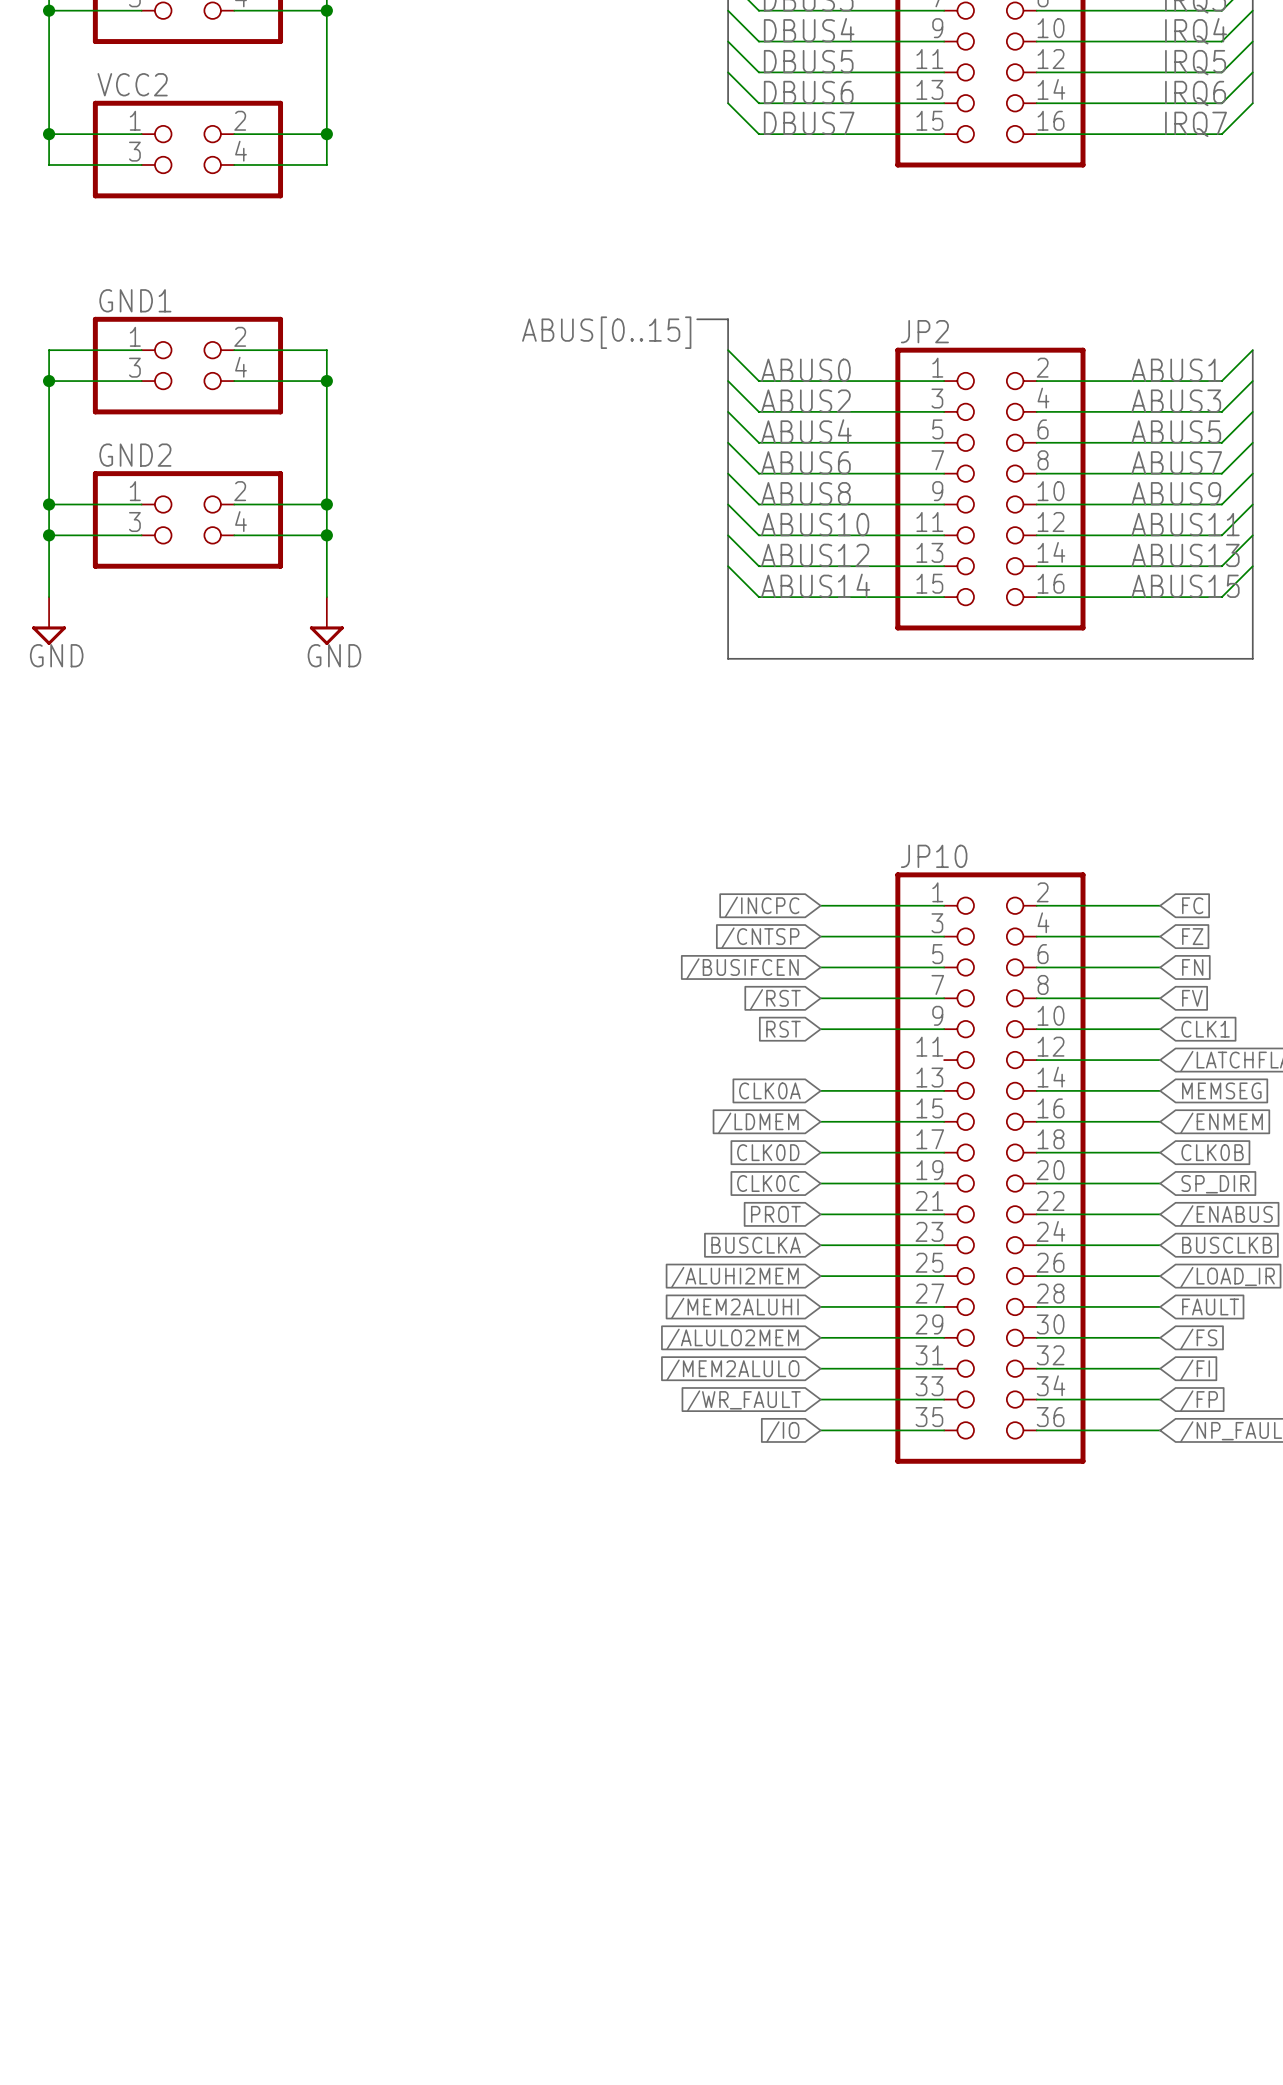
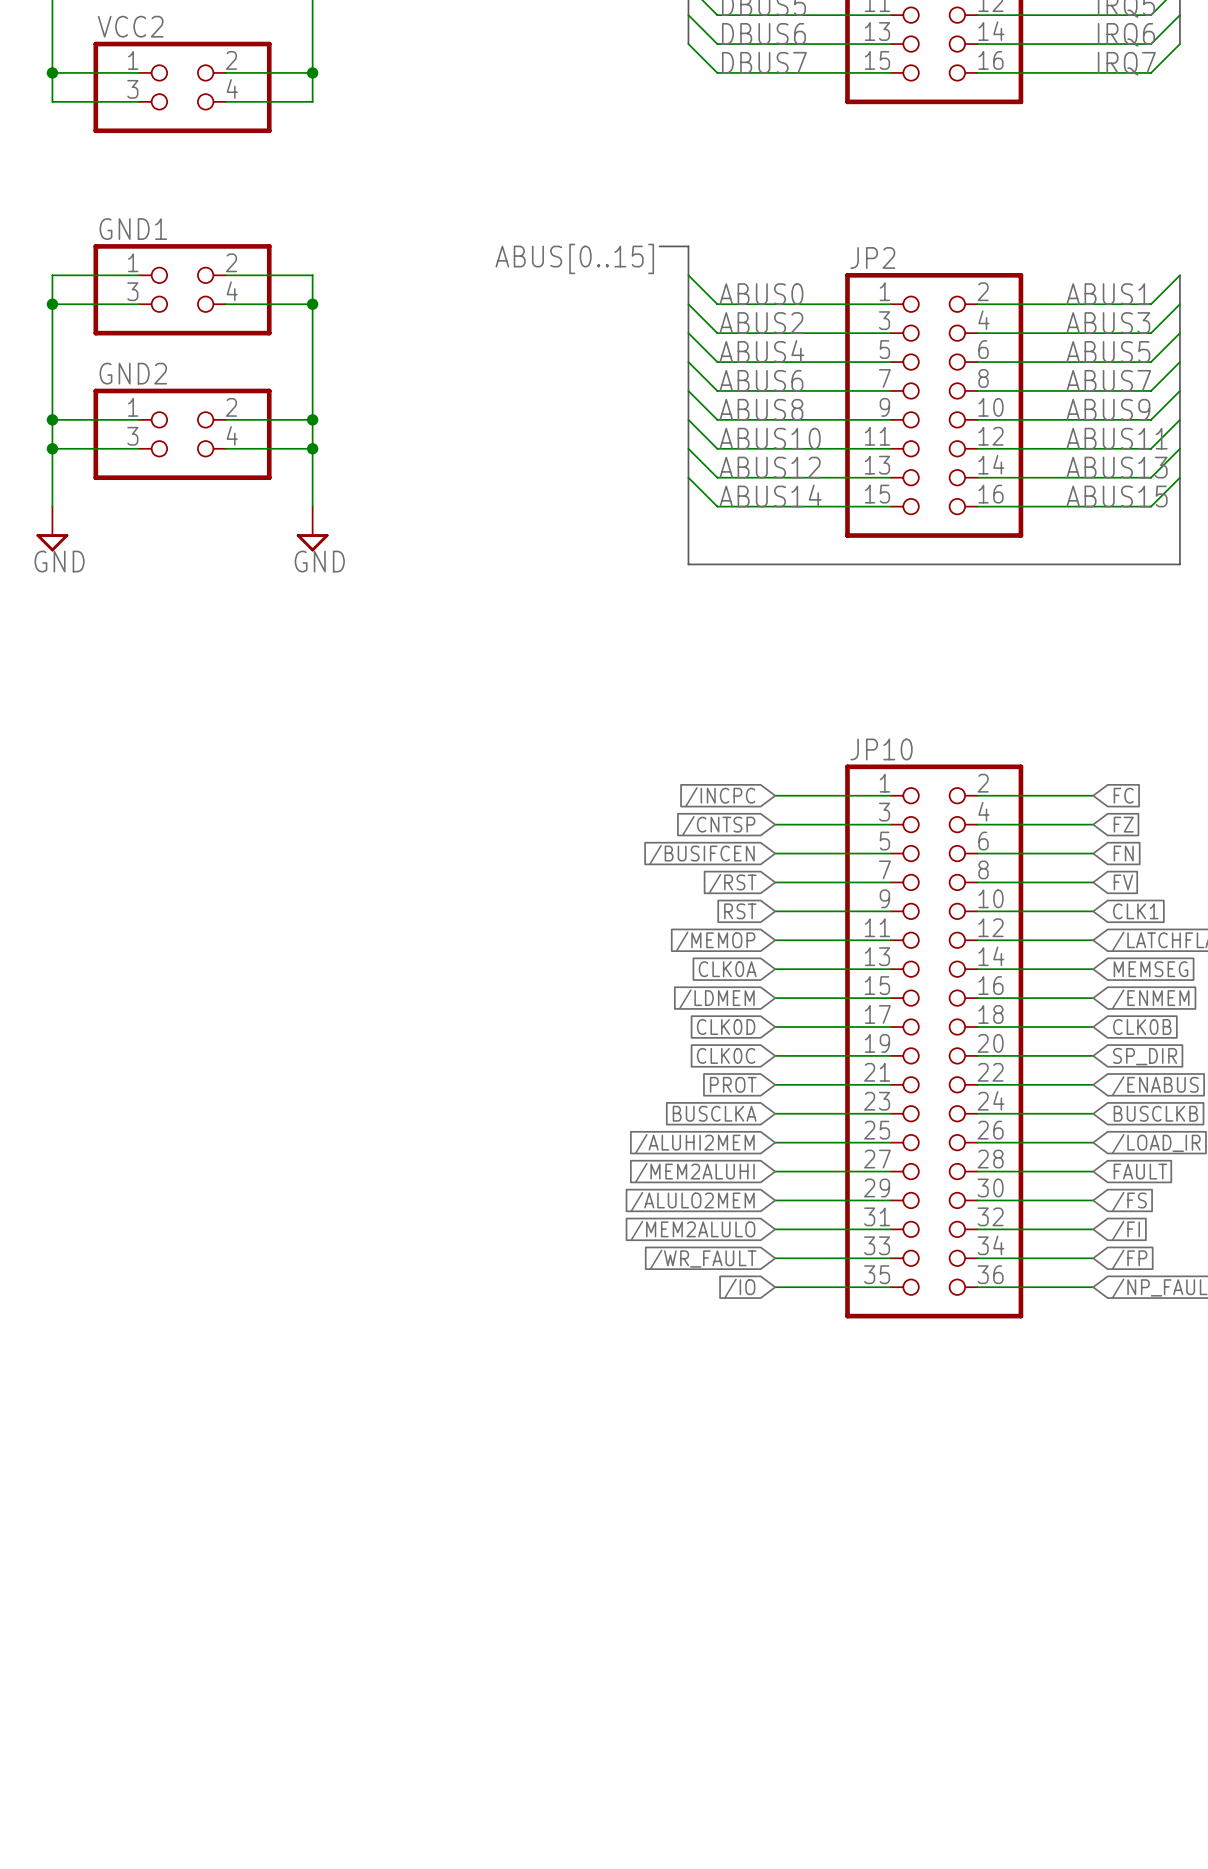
wire: none -> (775, 940) (890, 940)
global label: none -> /MEMOP (715, 941)

